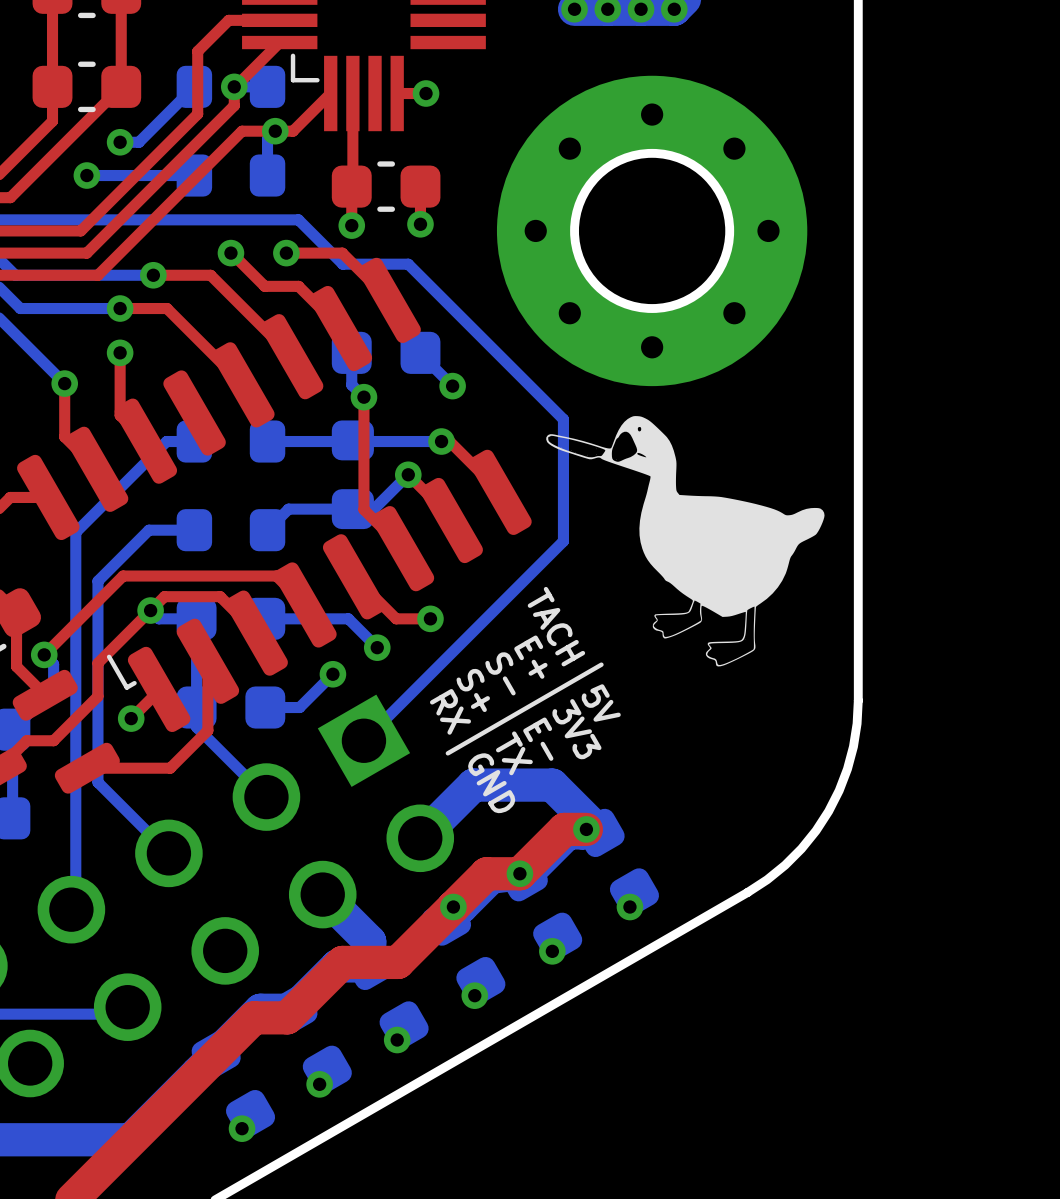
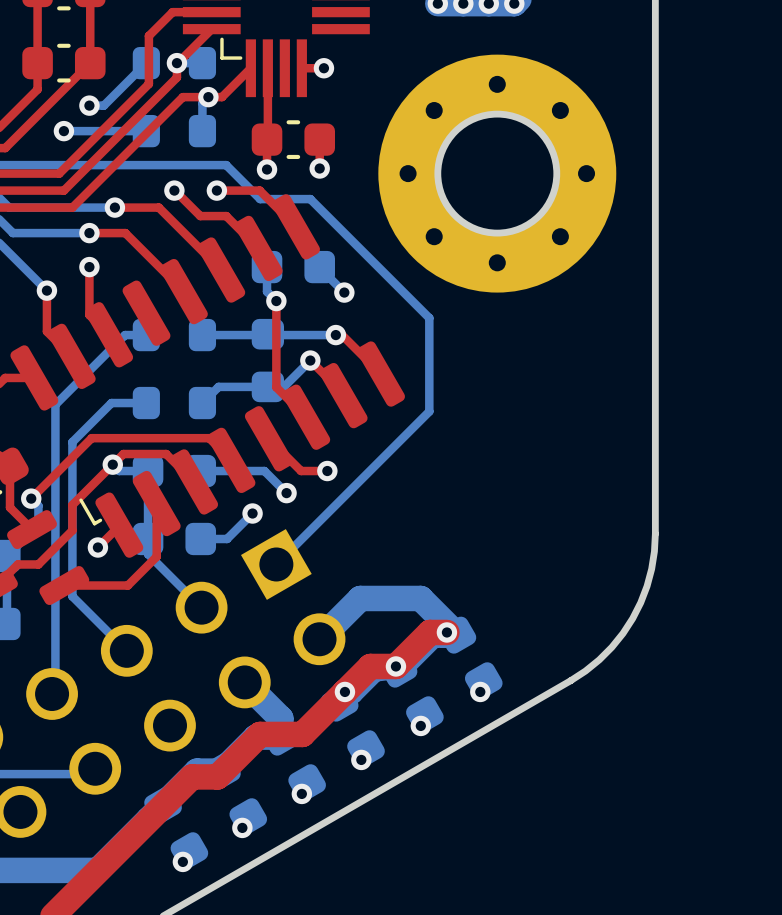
drawing: [546, 416, 825, 667] -> none
text: TACH (556, 626) -> none
text: E+ (530, 657) -> none
line: (601, 664) (447, 753) -> none
text: S- (500, 673) -> none
text: S+ (473, 690) -> none
text: 5V (601, 703) -> none
text: RX (450, 711) -> none
text: 3V3 (576, 729) -> none
text: E- (538, 739) -> none
text: TX (514, 753) -> none
text: GND (491, 783) -> none

